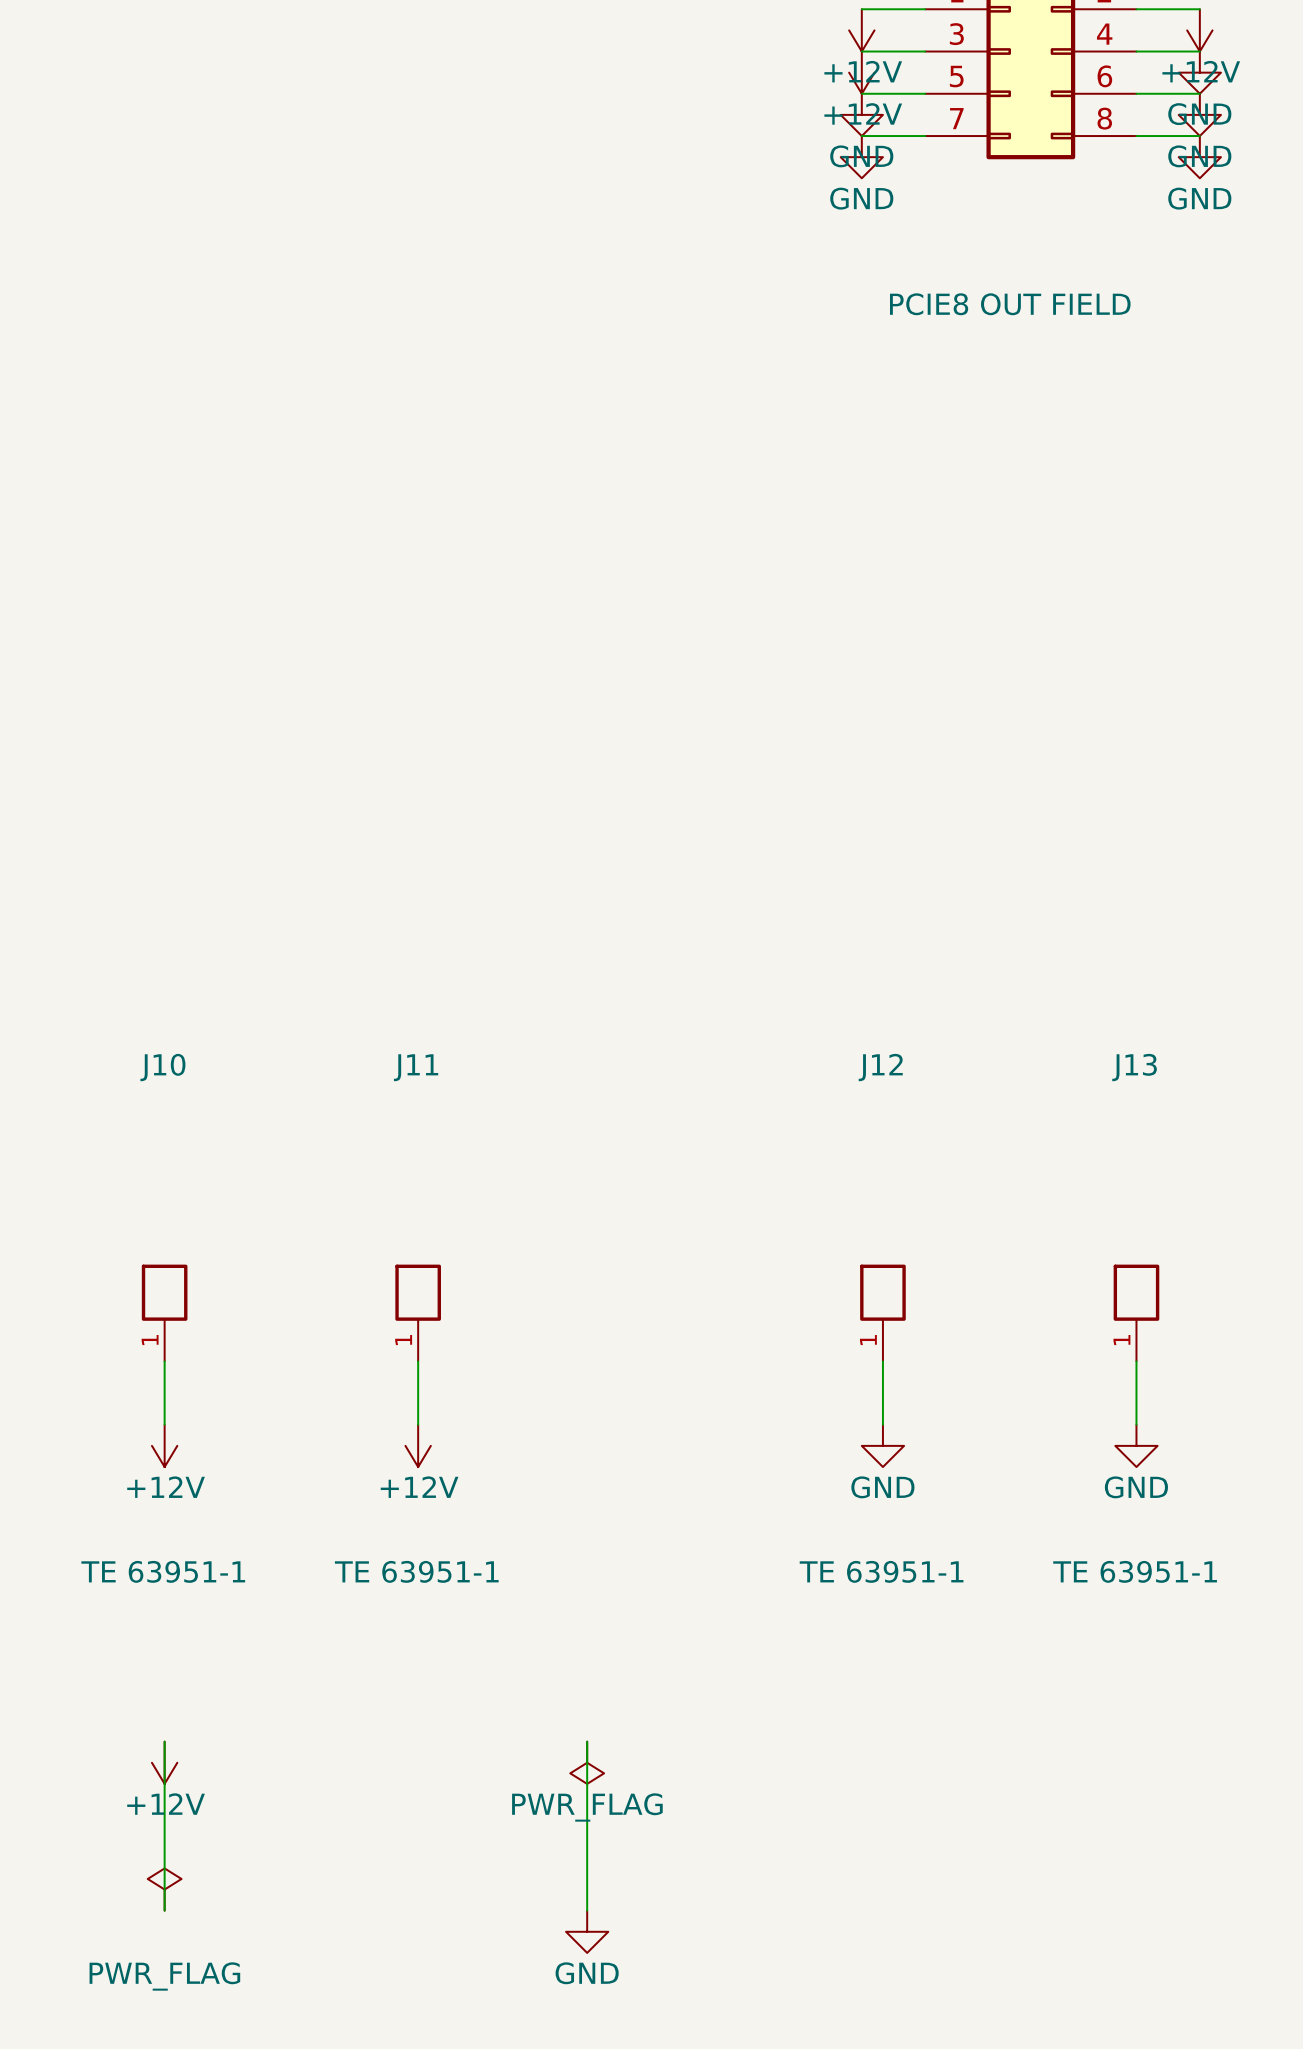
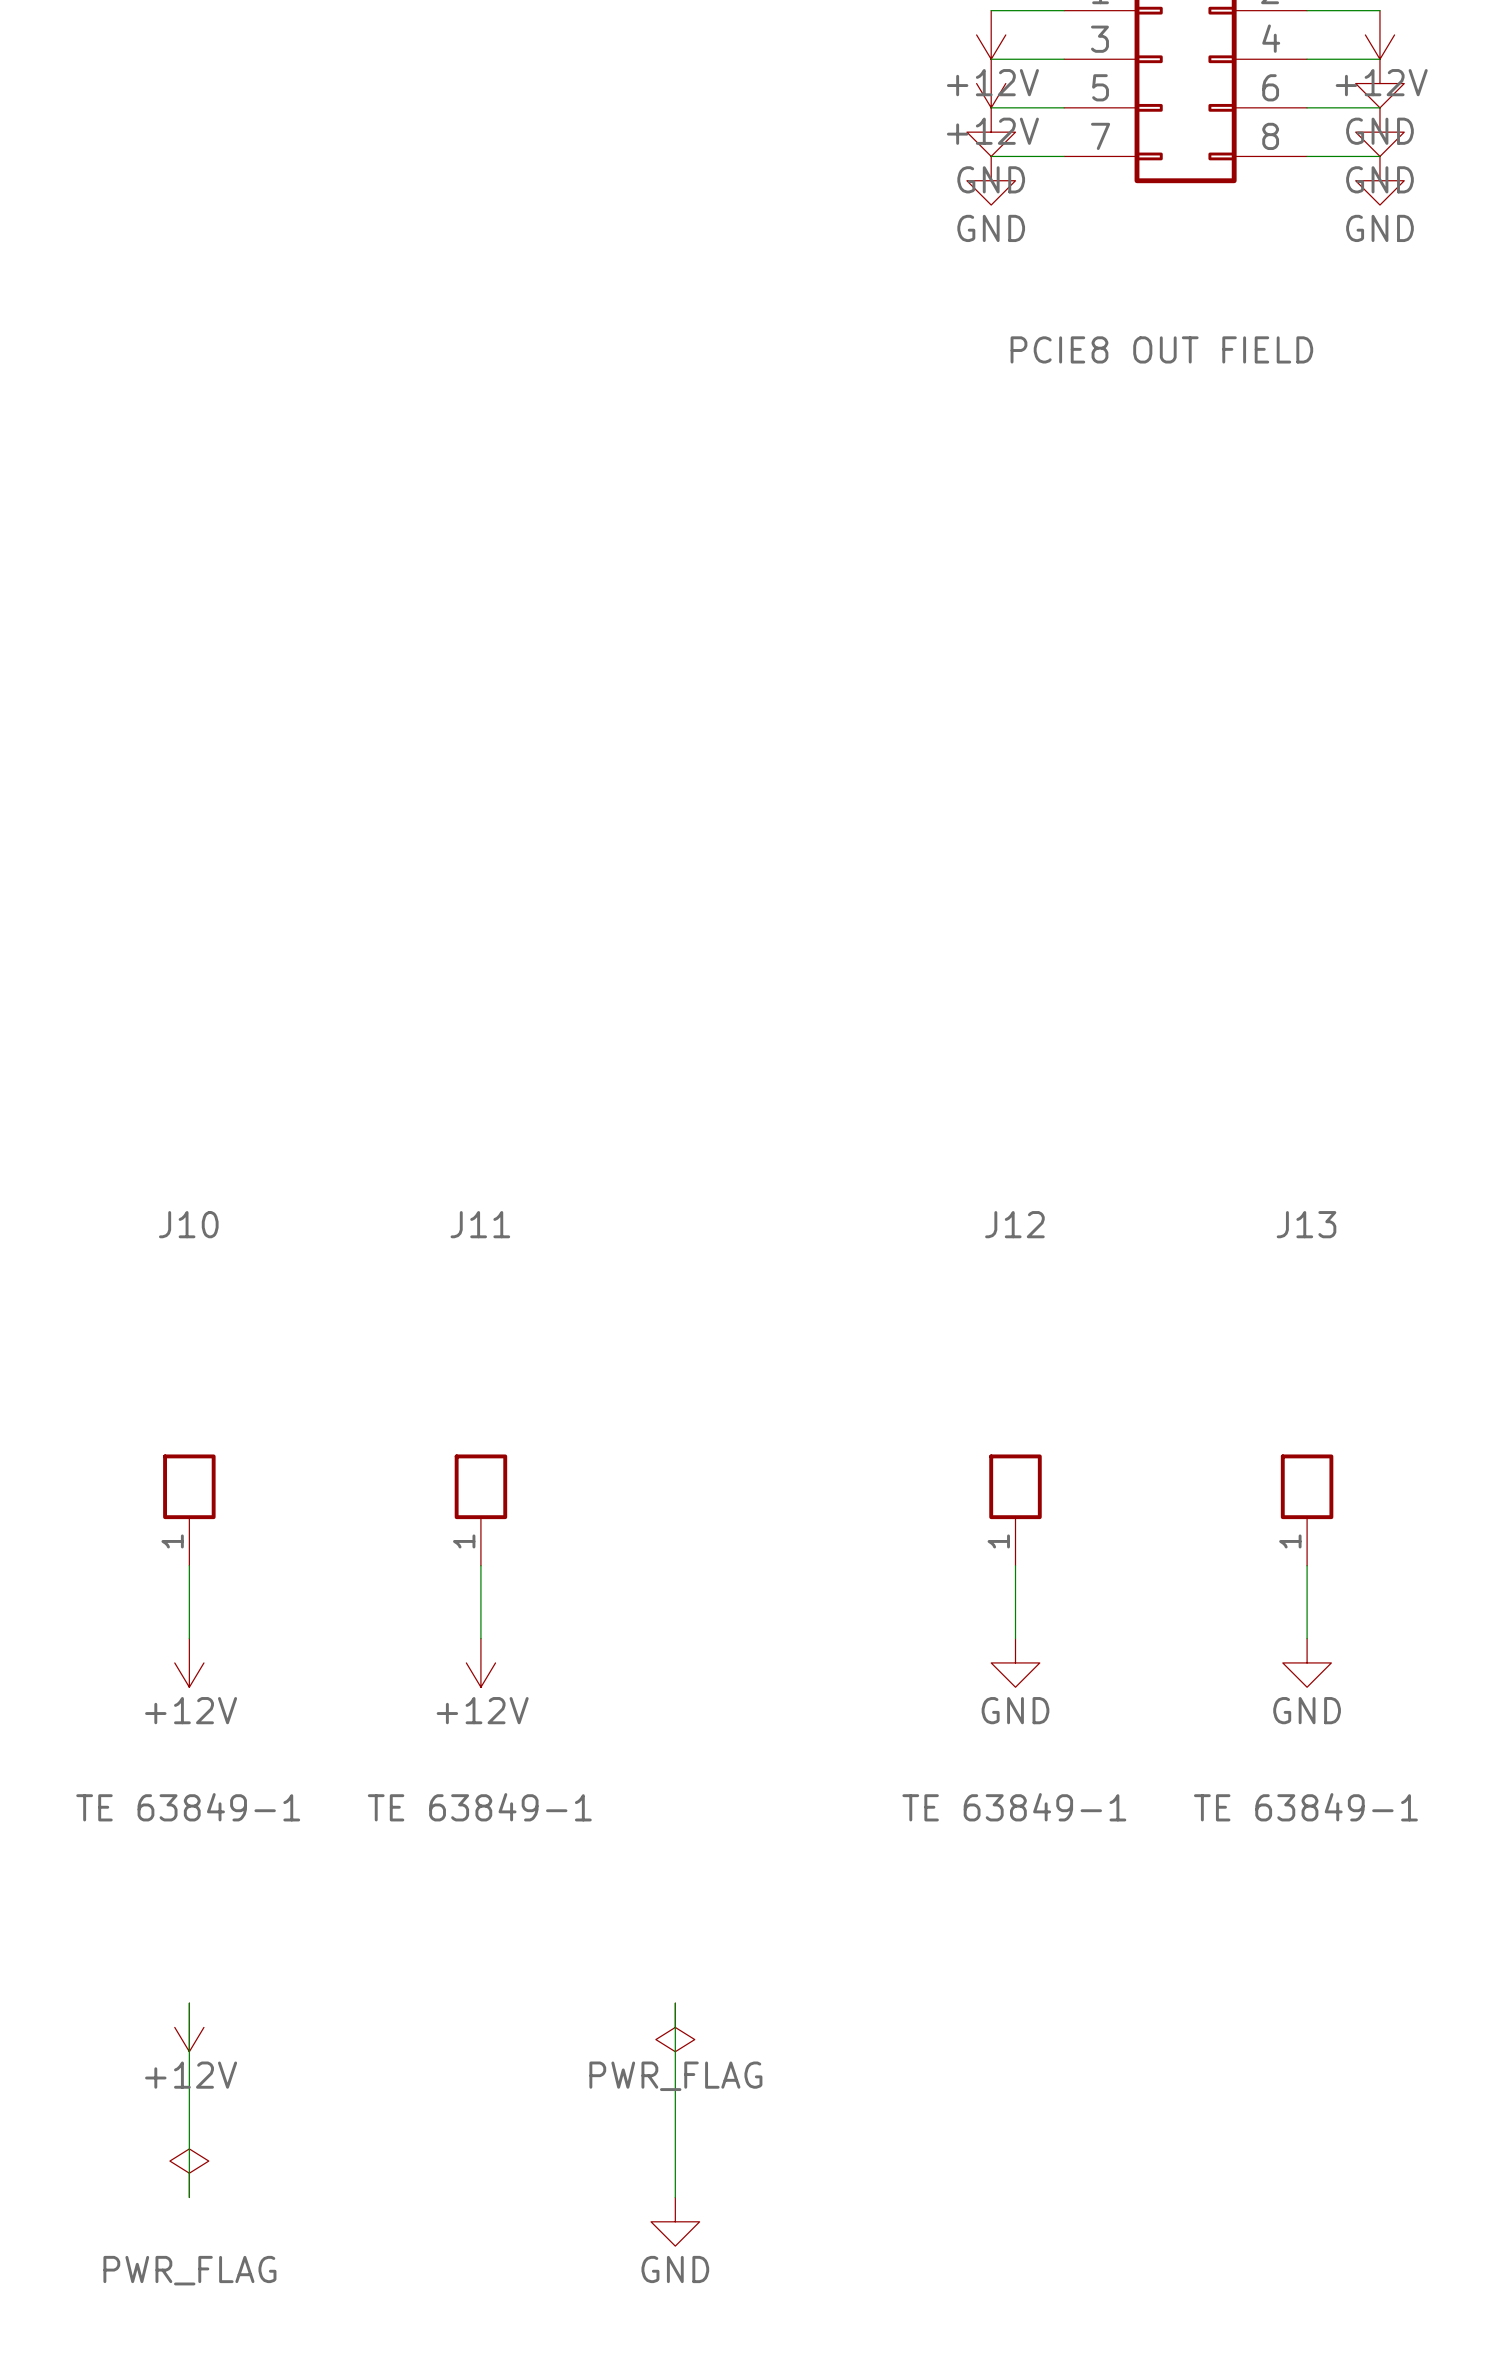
J10 value: TE 63951-1 (163, 1571) -> TE 63849-1 (188, 1807)
J11 value: TE 63951-1 (416, 1571) -> TE 63849-1 (479, 1807)
J12 value: TE 63951-1 (881, 1571) -> TE 63849-1 (1014, 1807)
J13 value: TE 63951-1 (1135, 1571) -> TE 63849-1 (1305, 1807)

